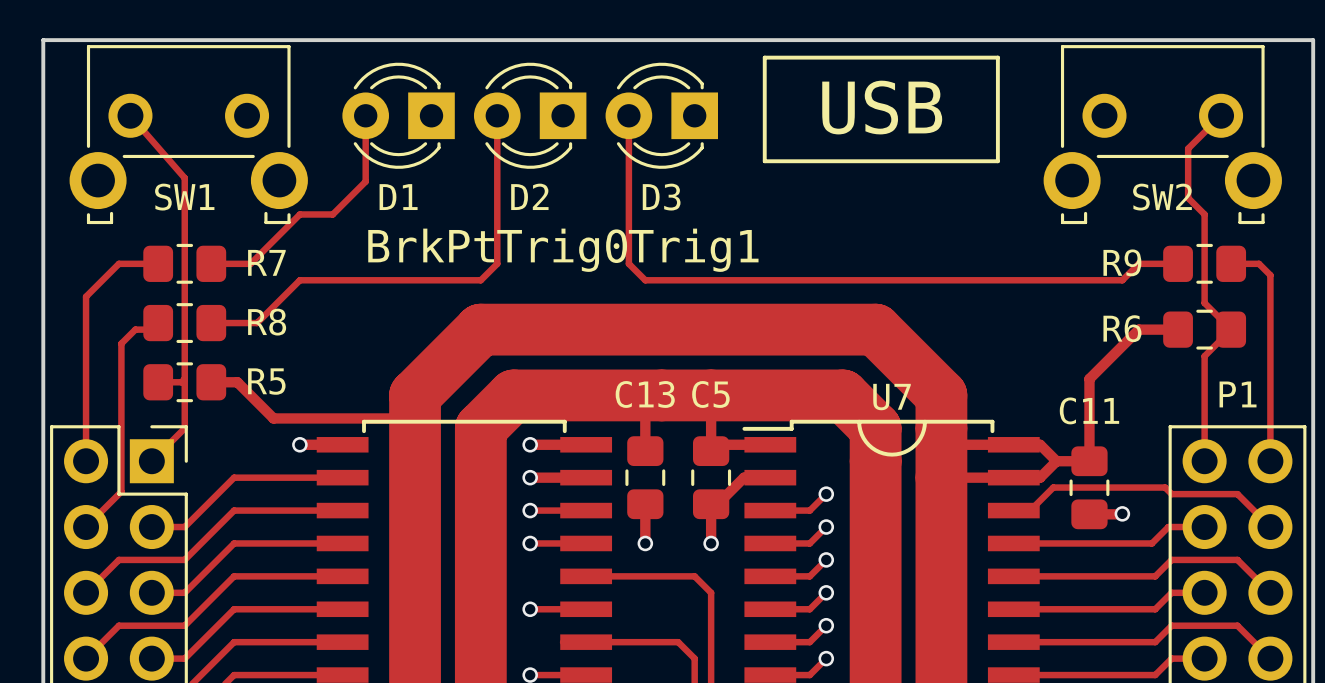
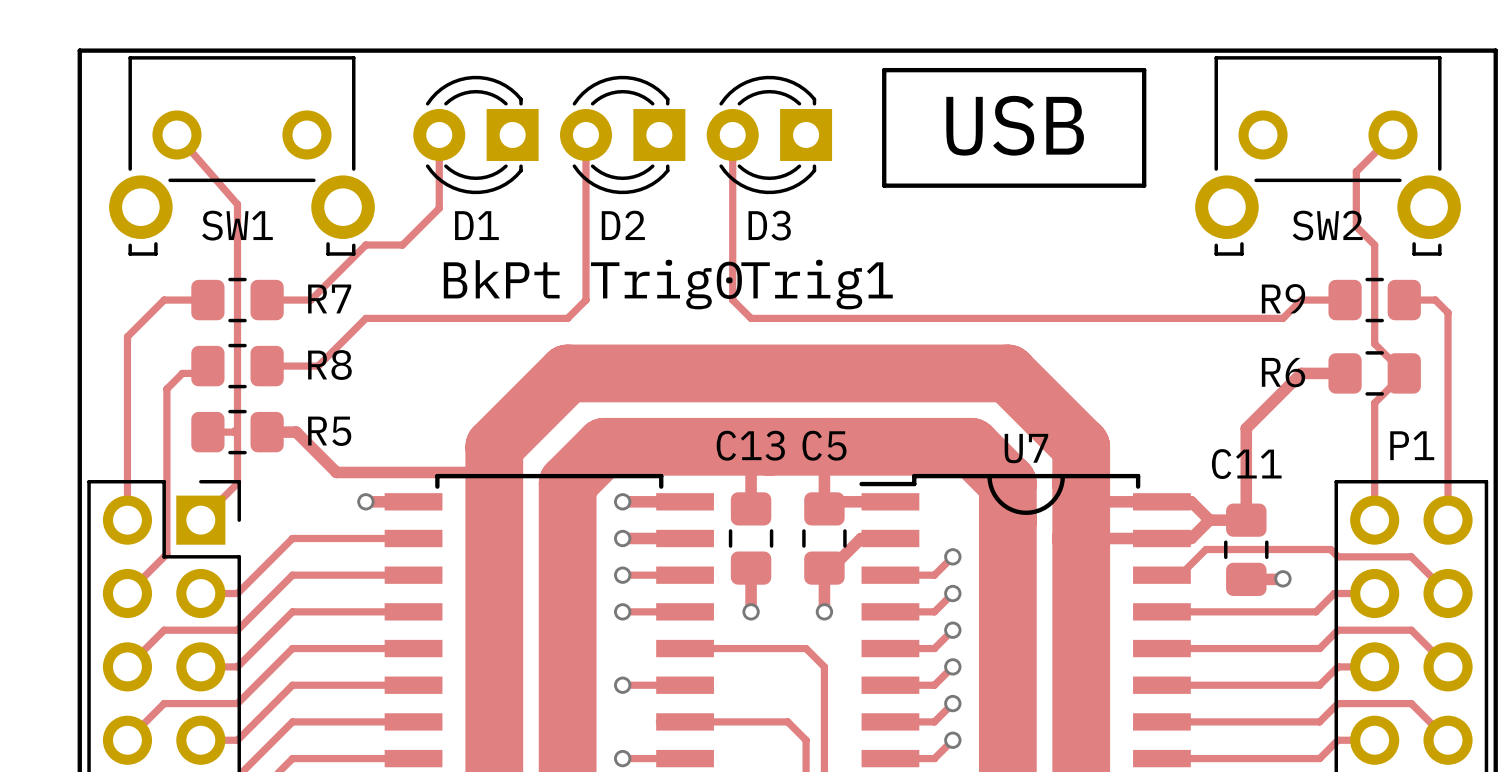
text: BrkPt (431, 245) -> BkPt (501, 279)
text position: Trig0 (562, 250) -> Trig0 (666, 284)
text position: Trig1 (693, 250) -> Trig1 (817, 284)

